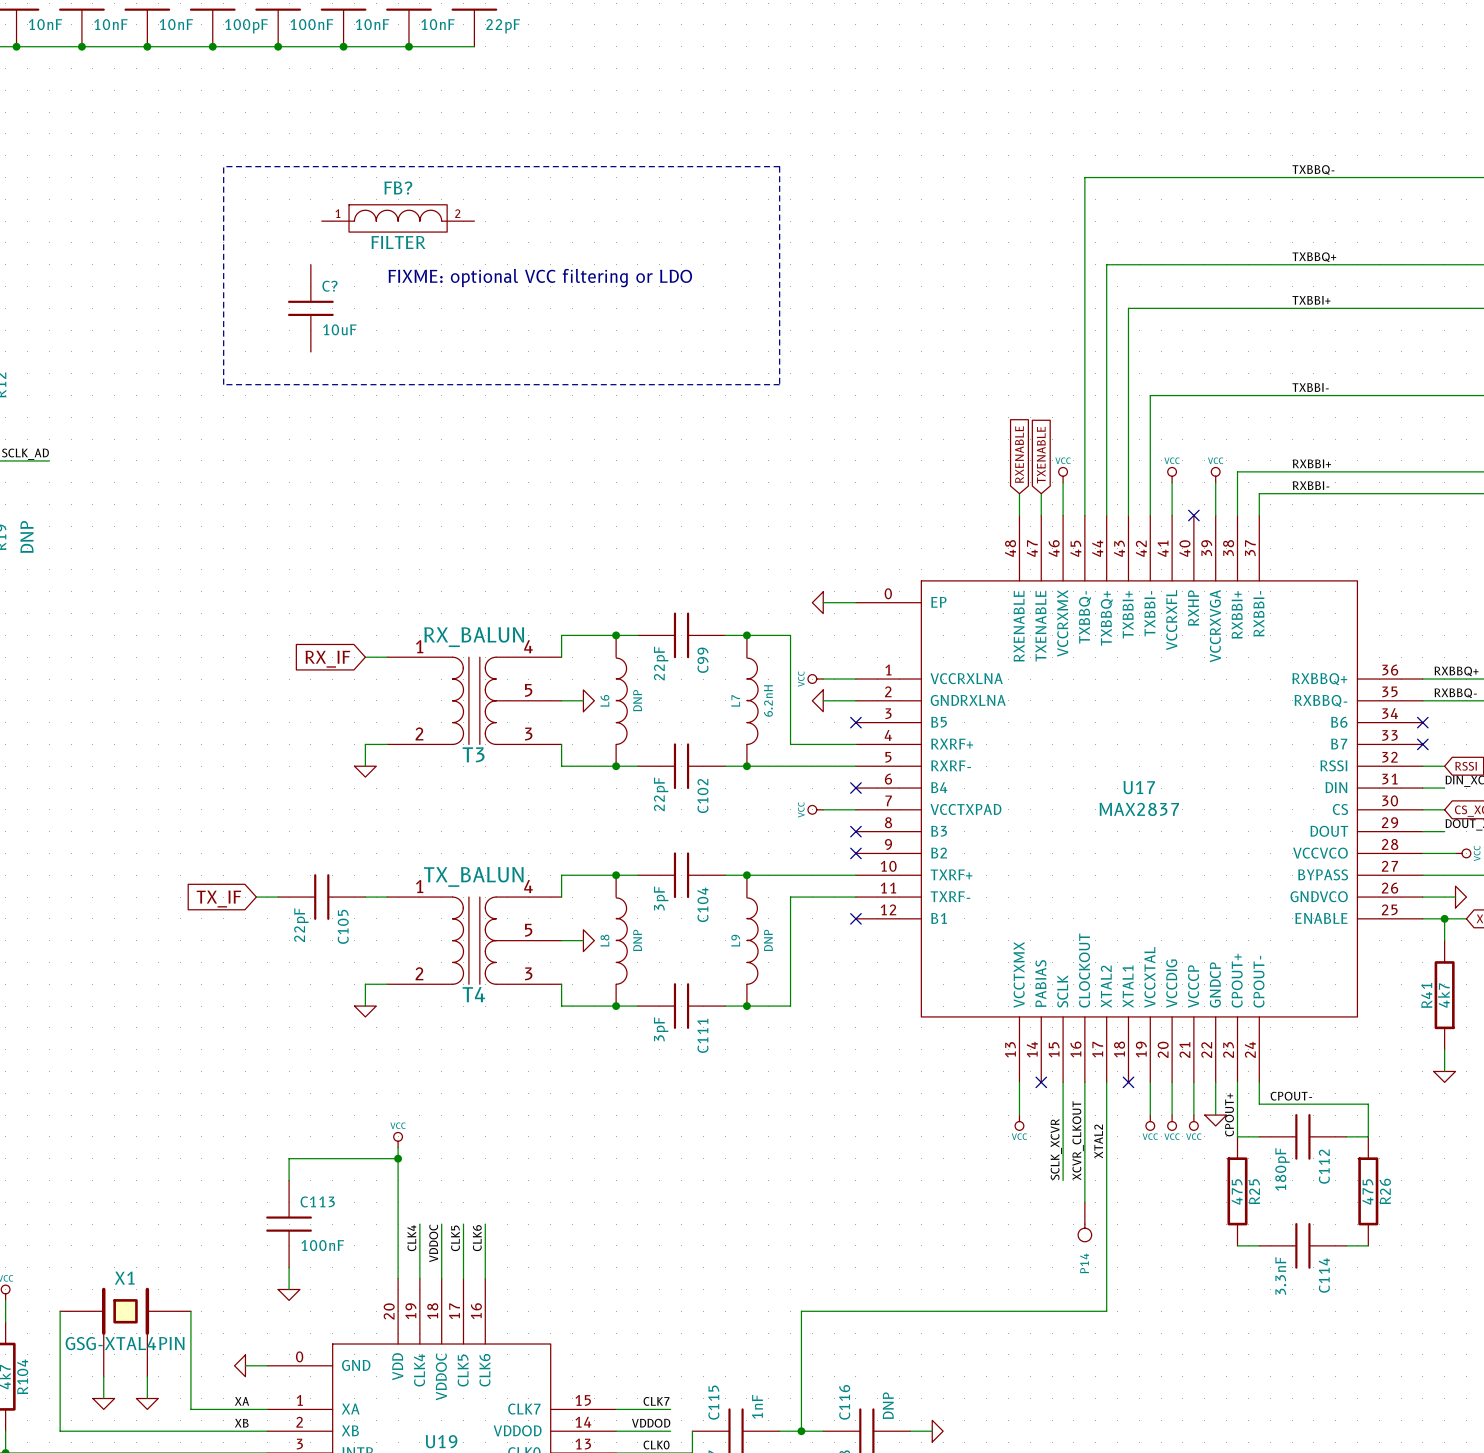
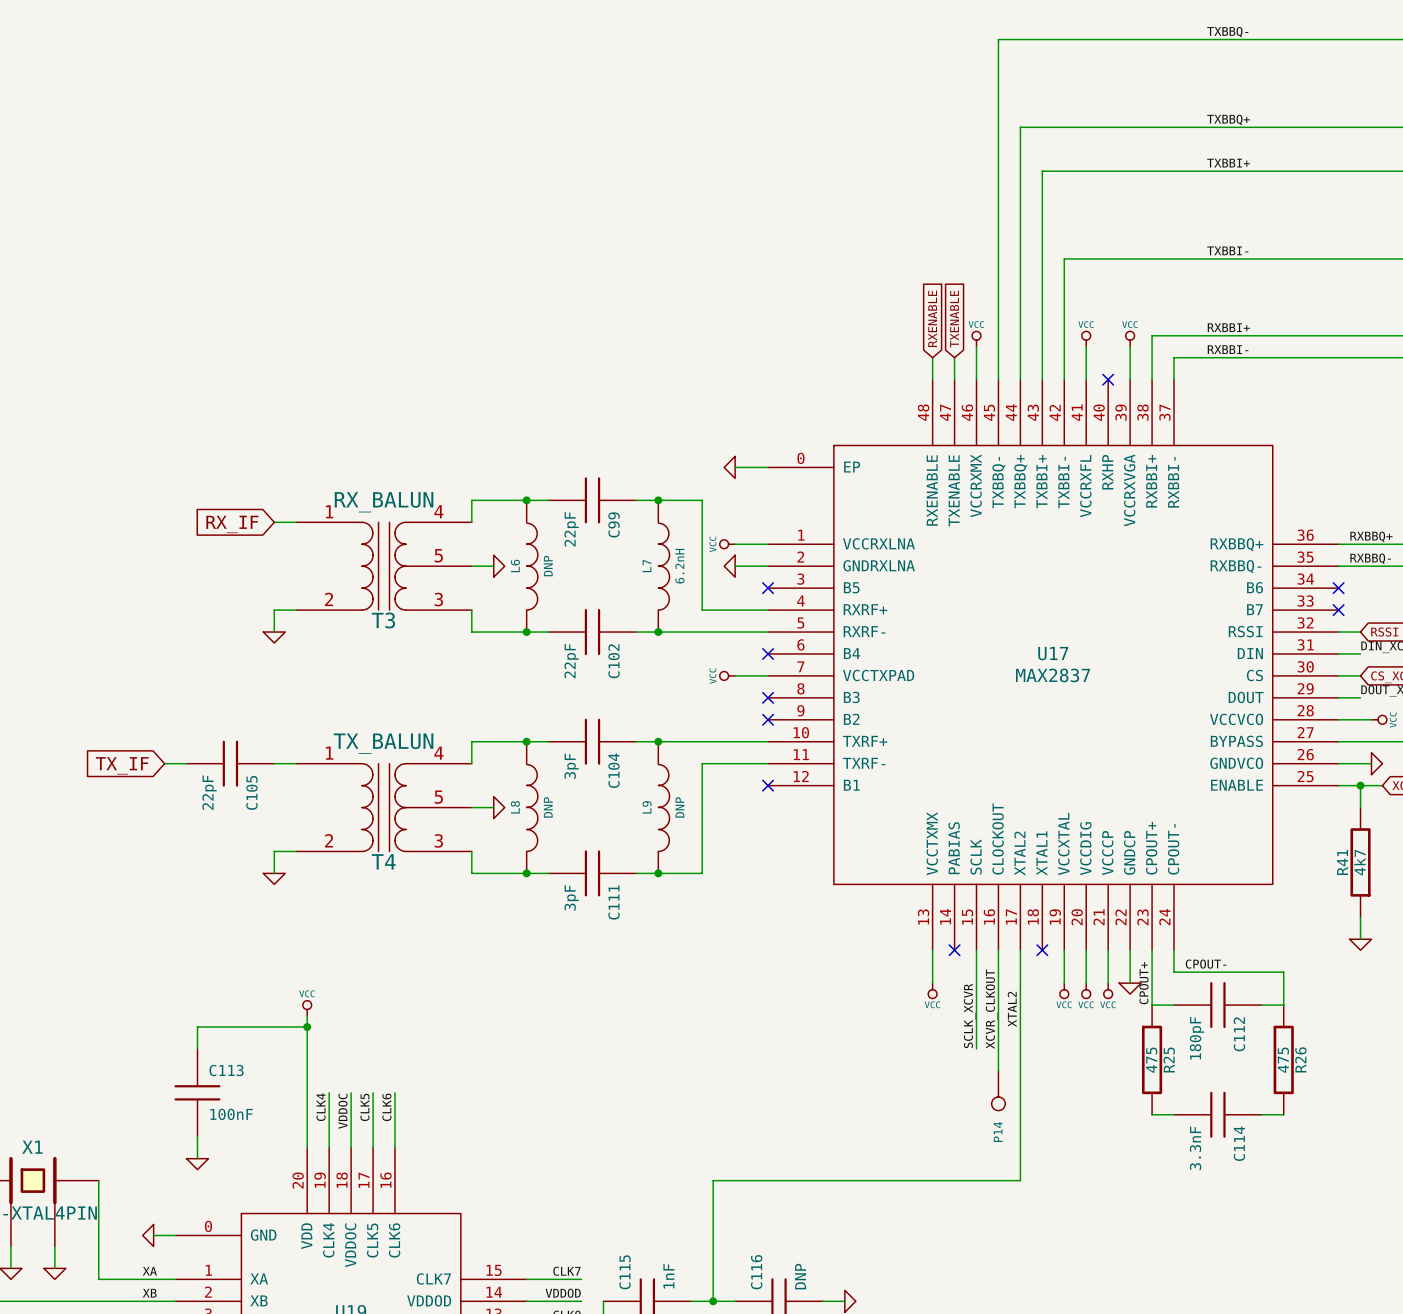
line: (223, 166) (779, 166) (779, 384) (223, 384) (223, 166) -> none
FB?: FILTER (398, 218) -> none
text: FIXME: optional VCC filtering or LDO (540, 278) -> none
C?: 10uF (310, 308) -> none

